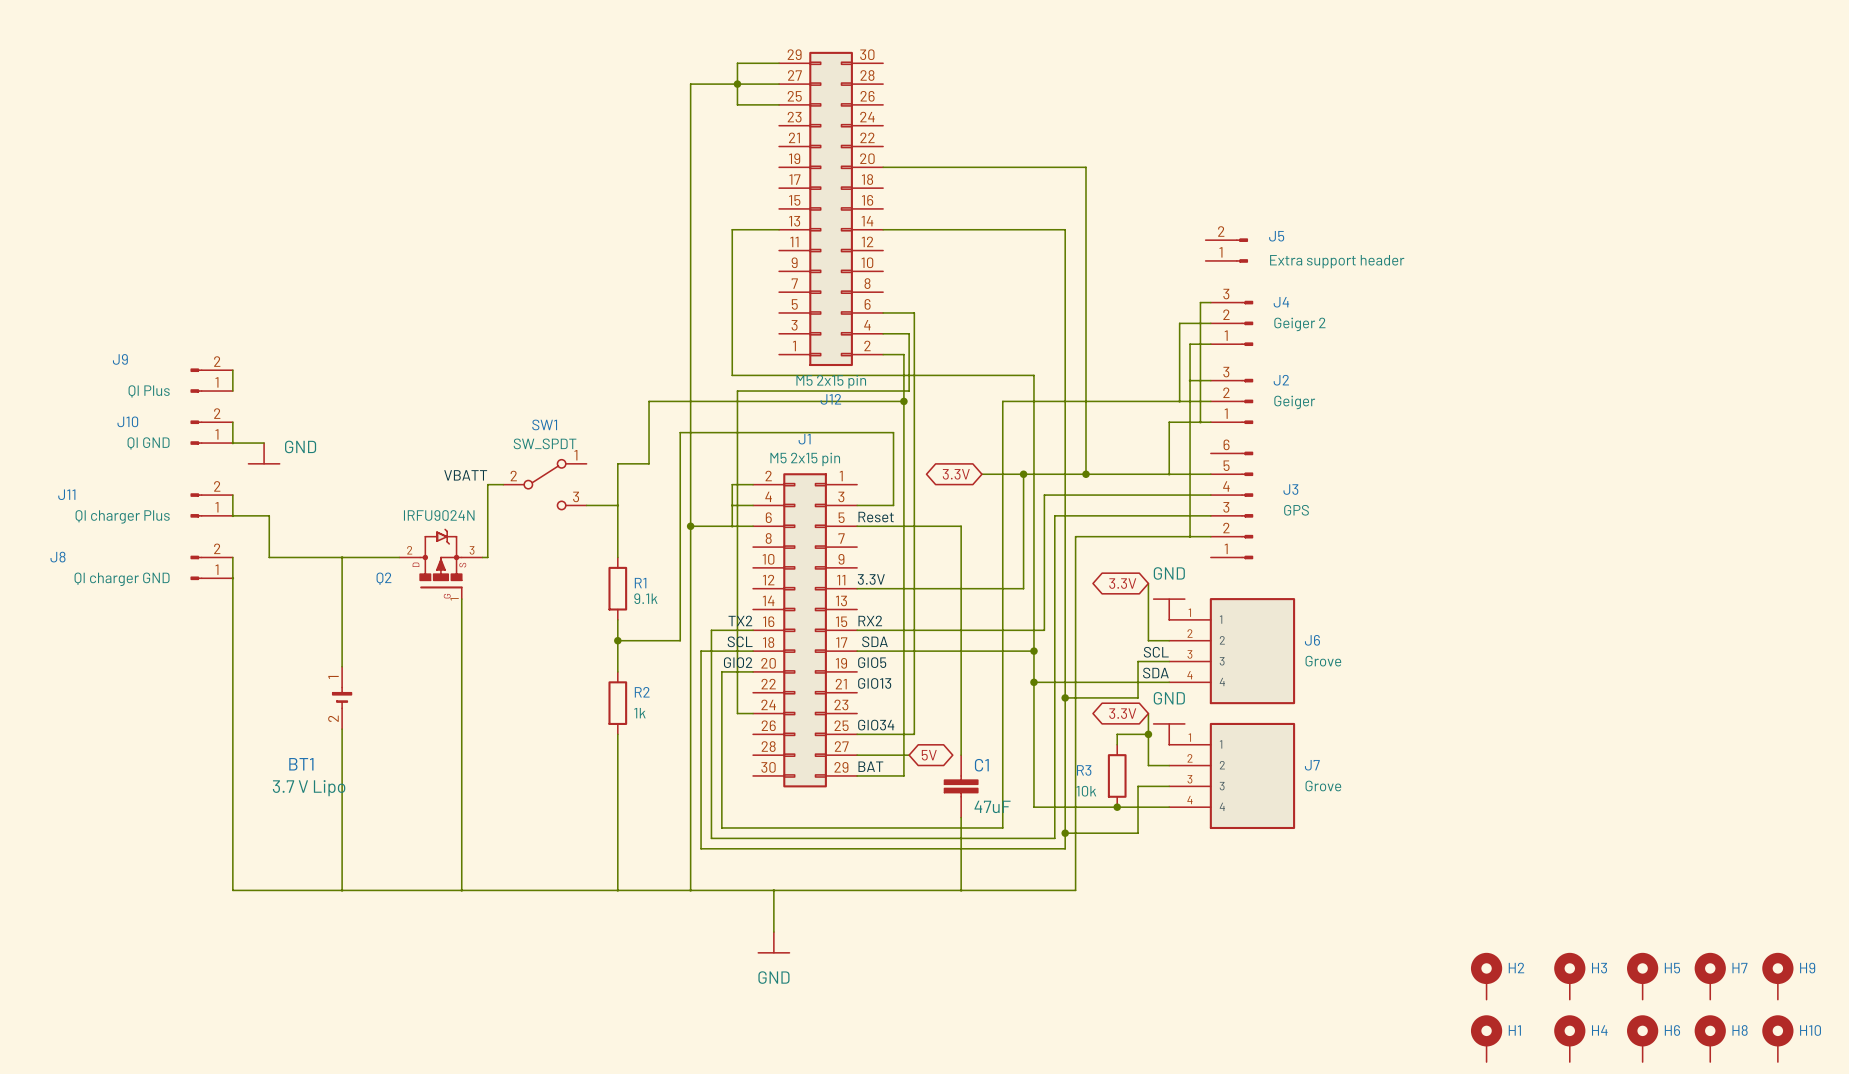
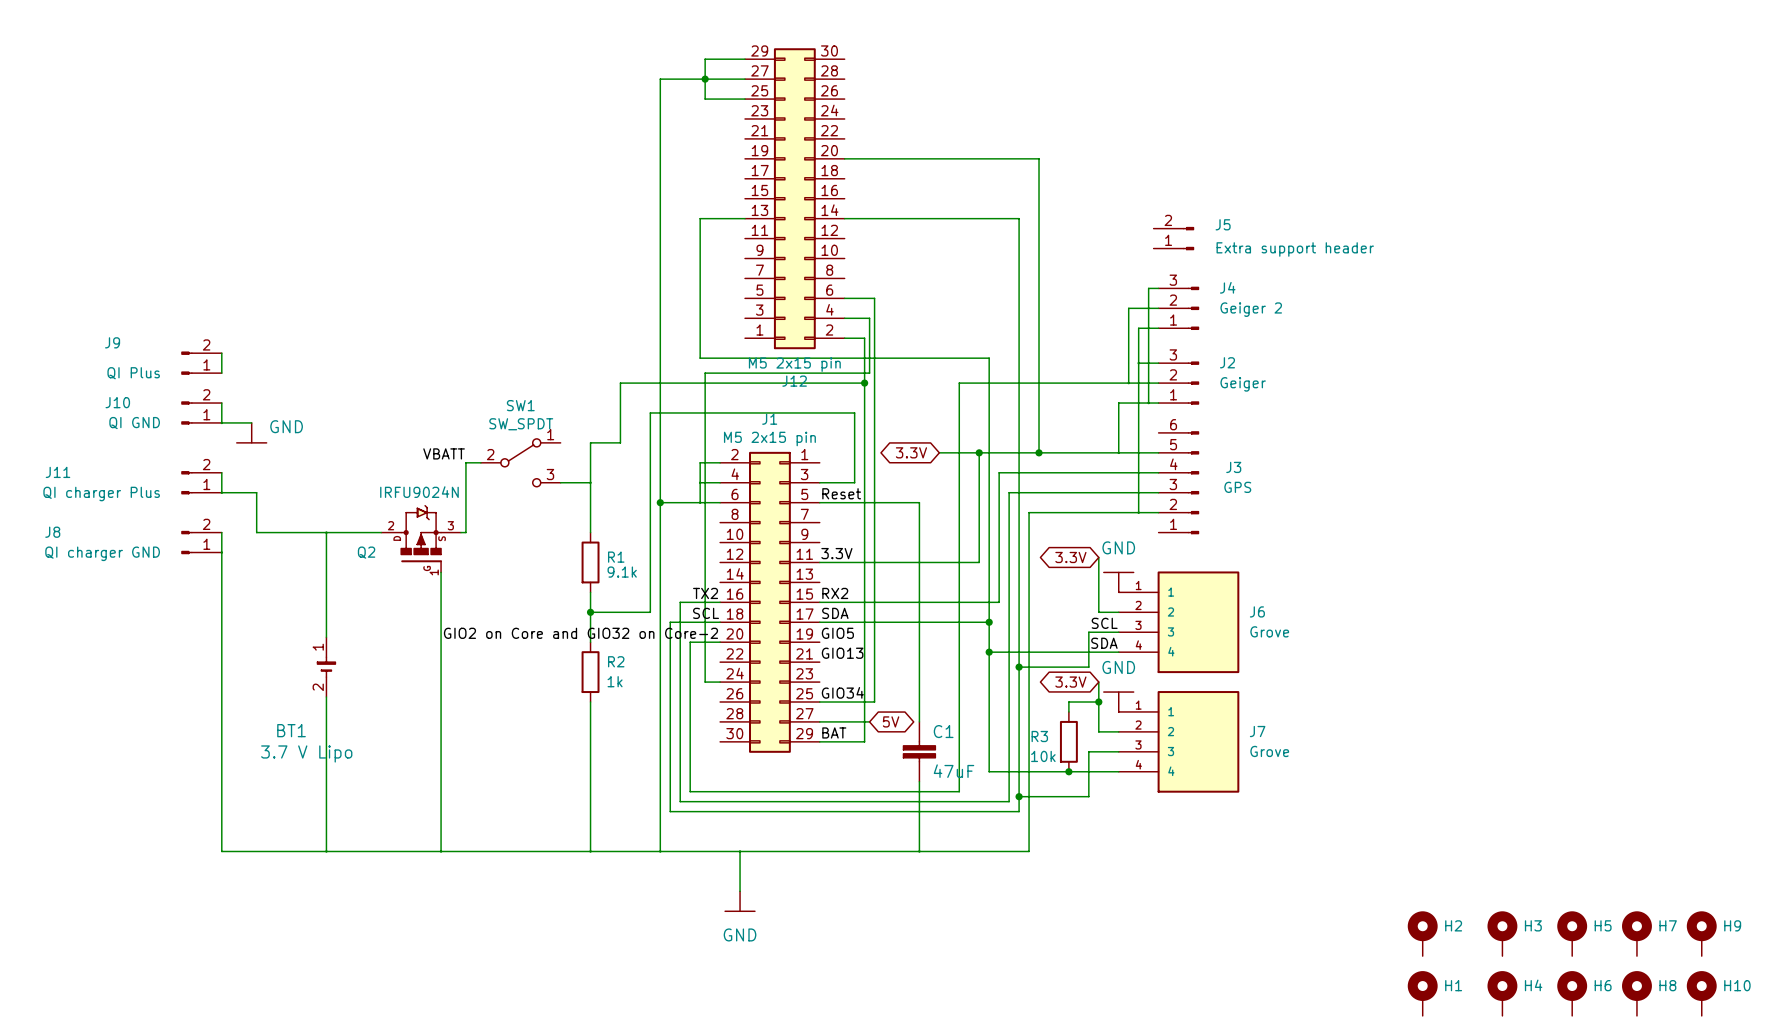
label: GIO2 (738, 662) -> GIO2 on Core and GIO32 on Core-2 (580, 633)

